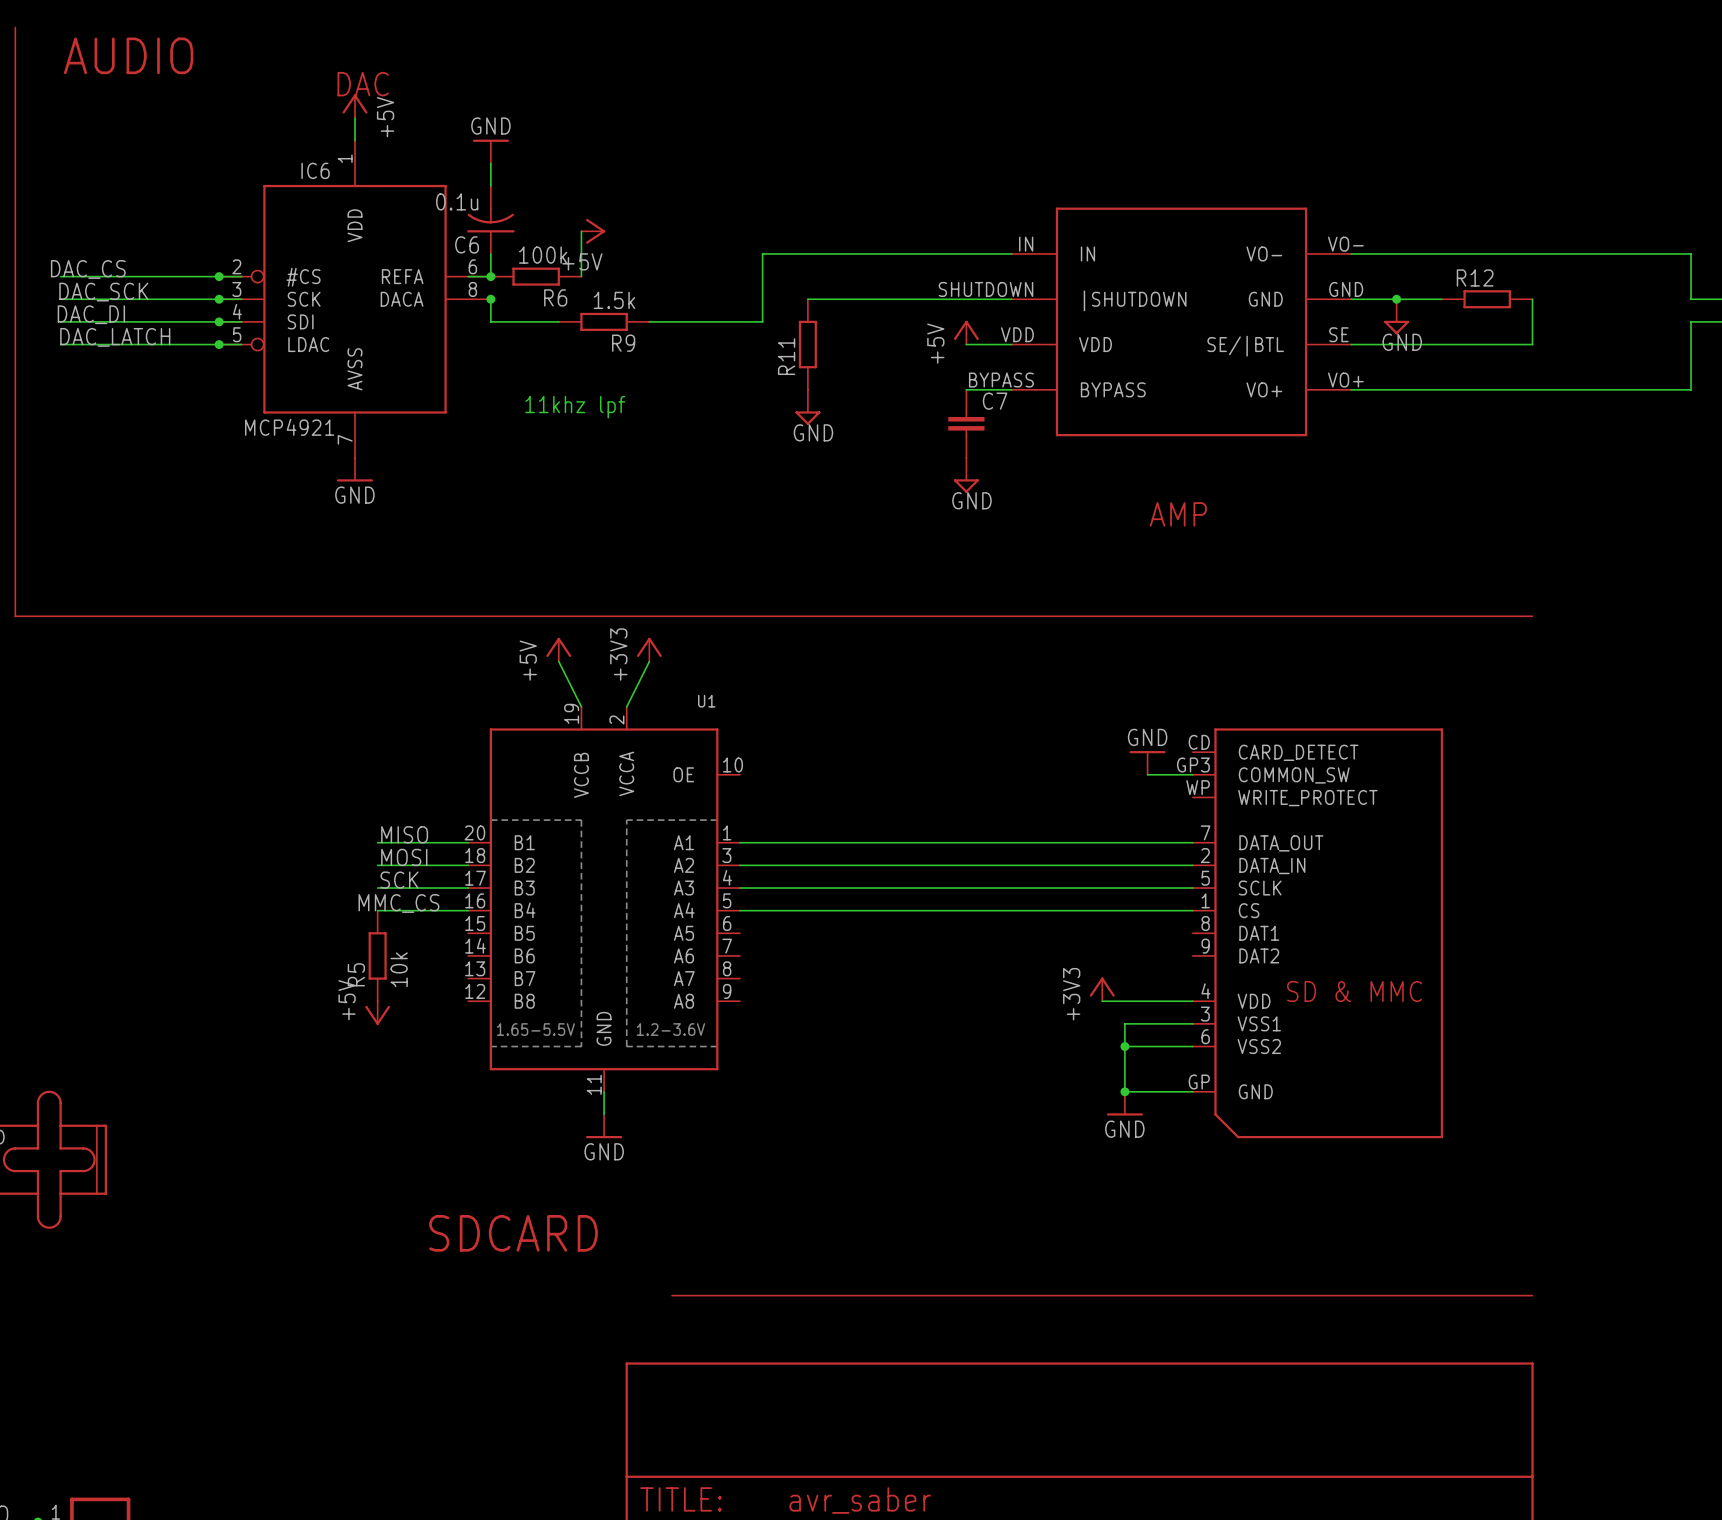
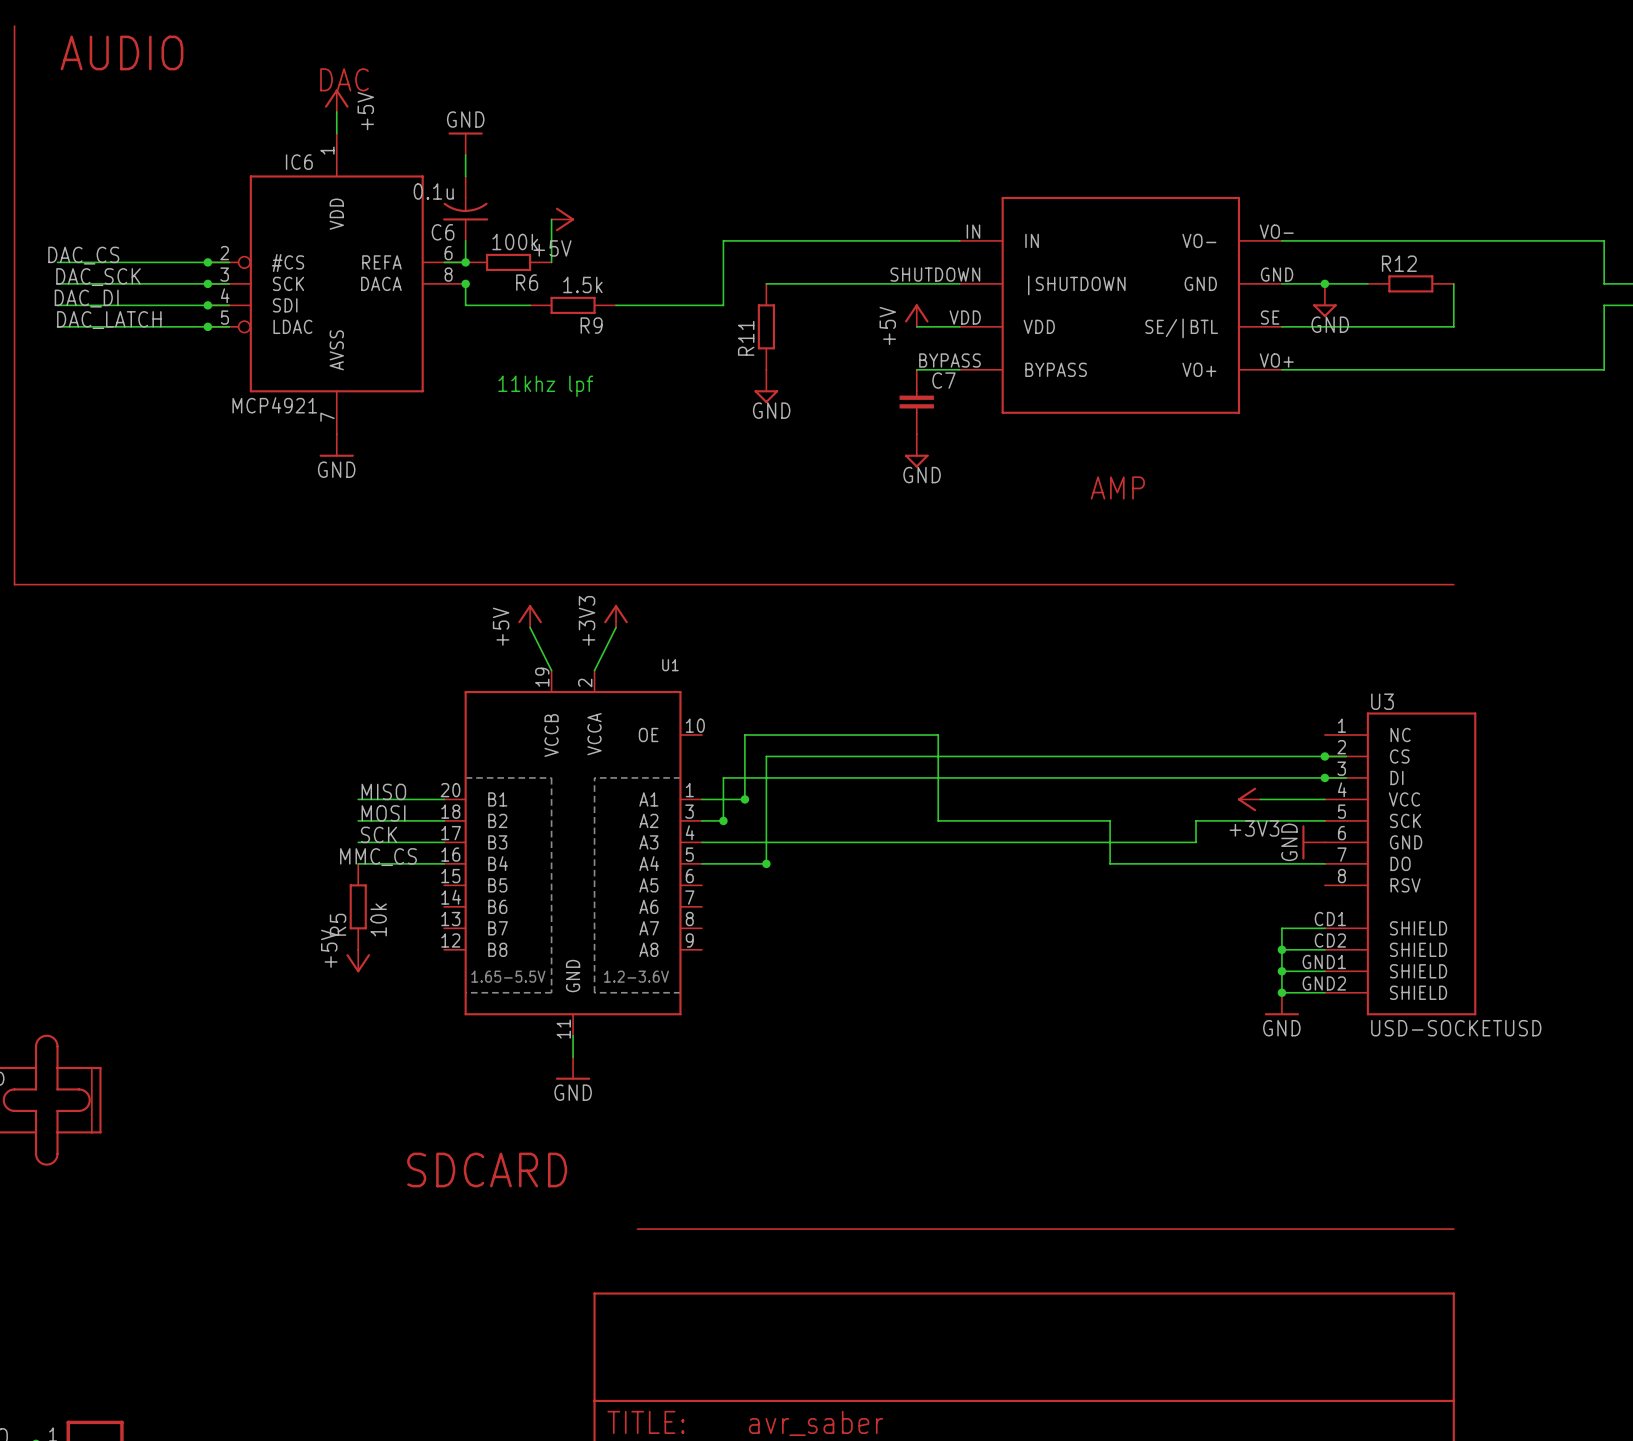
power symbol: GND (1147, 762) -> none
wire: (1147, 774) (1192, 774) -> none
junction: none -> (1324, 756)
junction: none -> (1324, 777)
wire: none -> (1346, 777) (723, 777) (723, 820)
wire: (785, 842) (1192, 842) -> none
junction: none -> (744, 799)
power symbol: none -> +3V3 (1249, 799)
wire: none -> (1260, 799) (1324, 799)
wire: (762, 865) (989, 865) -> (744, 799) (744, 735) (938, 735) (938, 820)
junction: none -> (723, 820)
wire: (1170, 865) (1192, 865) -> (1110, 820) (1110, 863)
wire: none -> (1324, 820) (1196, 820) (1196, 842) (1131, 842)
power symbol: none -> GND (1313, 842)
wire: (807, 910) (1170, 910) -> (766, 863) (766, 756) (1346, 756)
junction: none -> (766, 863)
wire: none -> (1131, 863) (1324, 863)
U3: none -> USD-SOCKETUSD (1400, 863)
part: (1317, 933) -> none
wire: none -> (1324, 928) (1281, 928) (1281, 992) (1324, 992)
power symbol: +3V3 (1102, 989) -> none
wire: (1102, 1001) (1192, 1001) -> none
wire: none -> (1281, 949) (1324, 949)
junction: none -> (1281, 949)
wire: (1192, 1023) (1124, 1023) (1124, 1091) (1192, 1091) -> none
wire: none -> (1281, 971) (1324, 971)
junction: none -> (1281, 971)
wire: (1124, 1046) (1192, 1046) -> none
junction: (1124, 1046) -> none
junction: none -> (1281, 992)
power symbol: none -> GND (1281, 1004)
junction: (1124, 1091) -> none
power symbol: GND (1124, 1103) -> none

